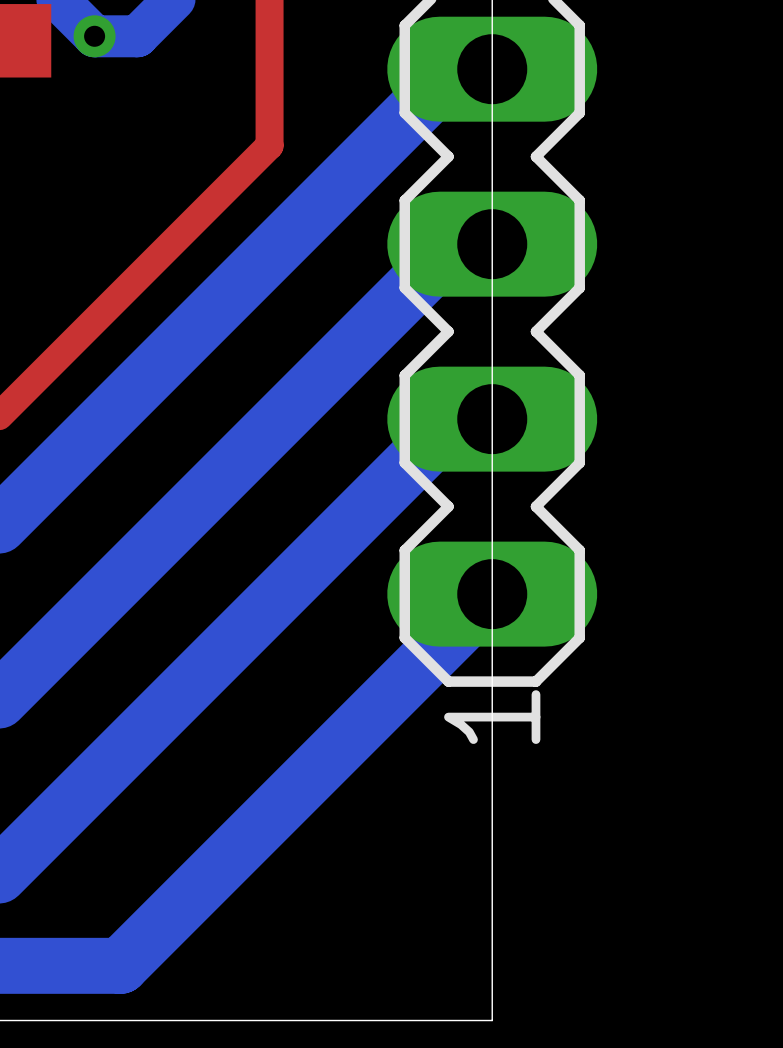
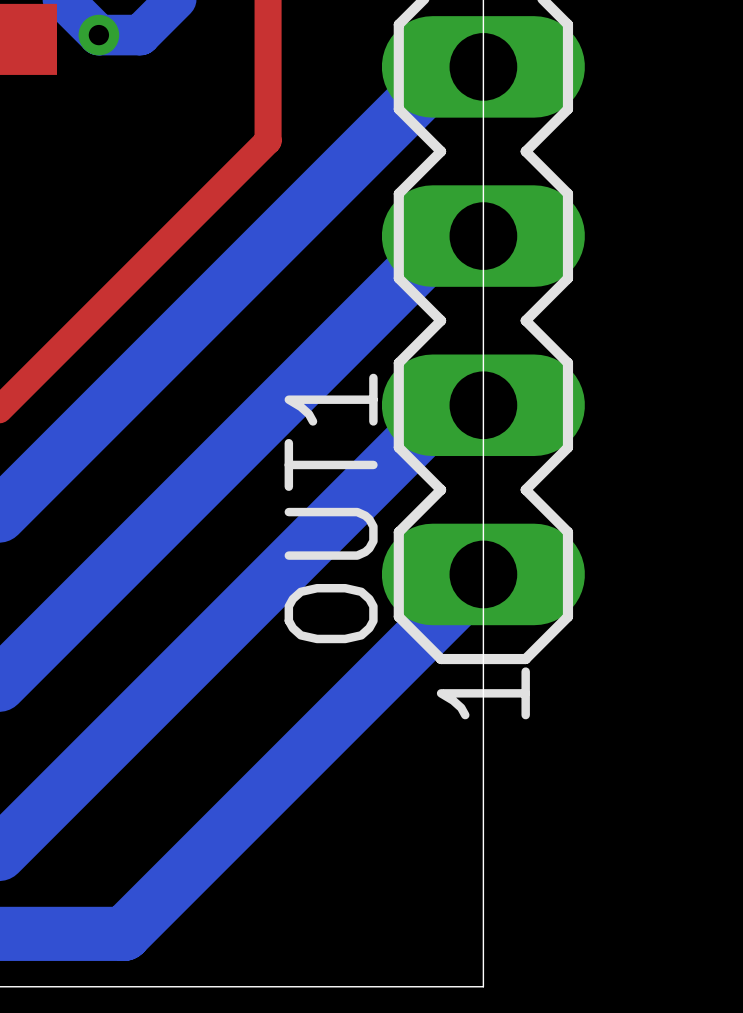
OUT1 name: none -> OUT1 (331, 508)

